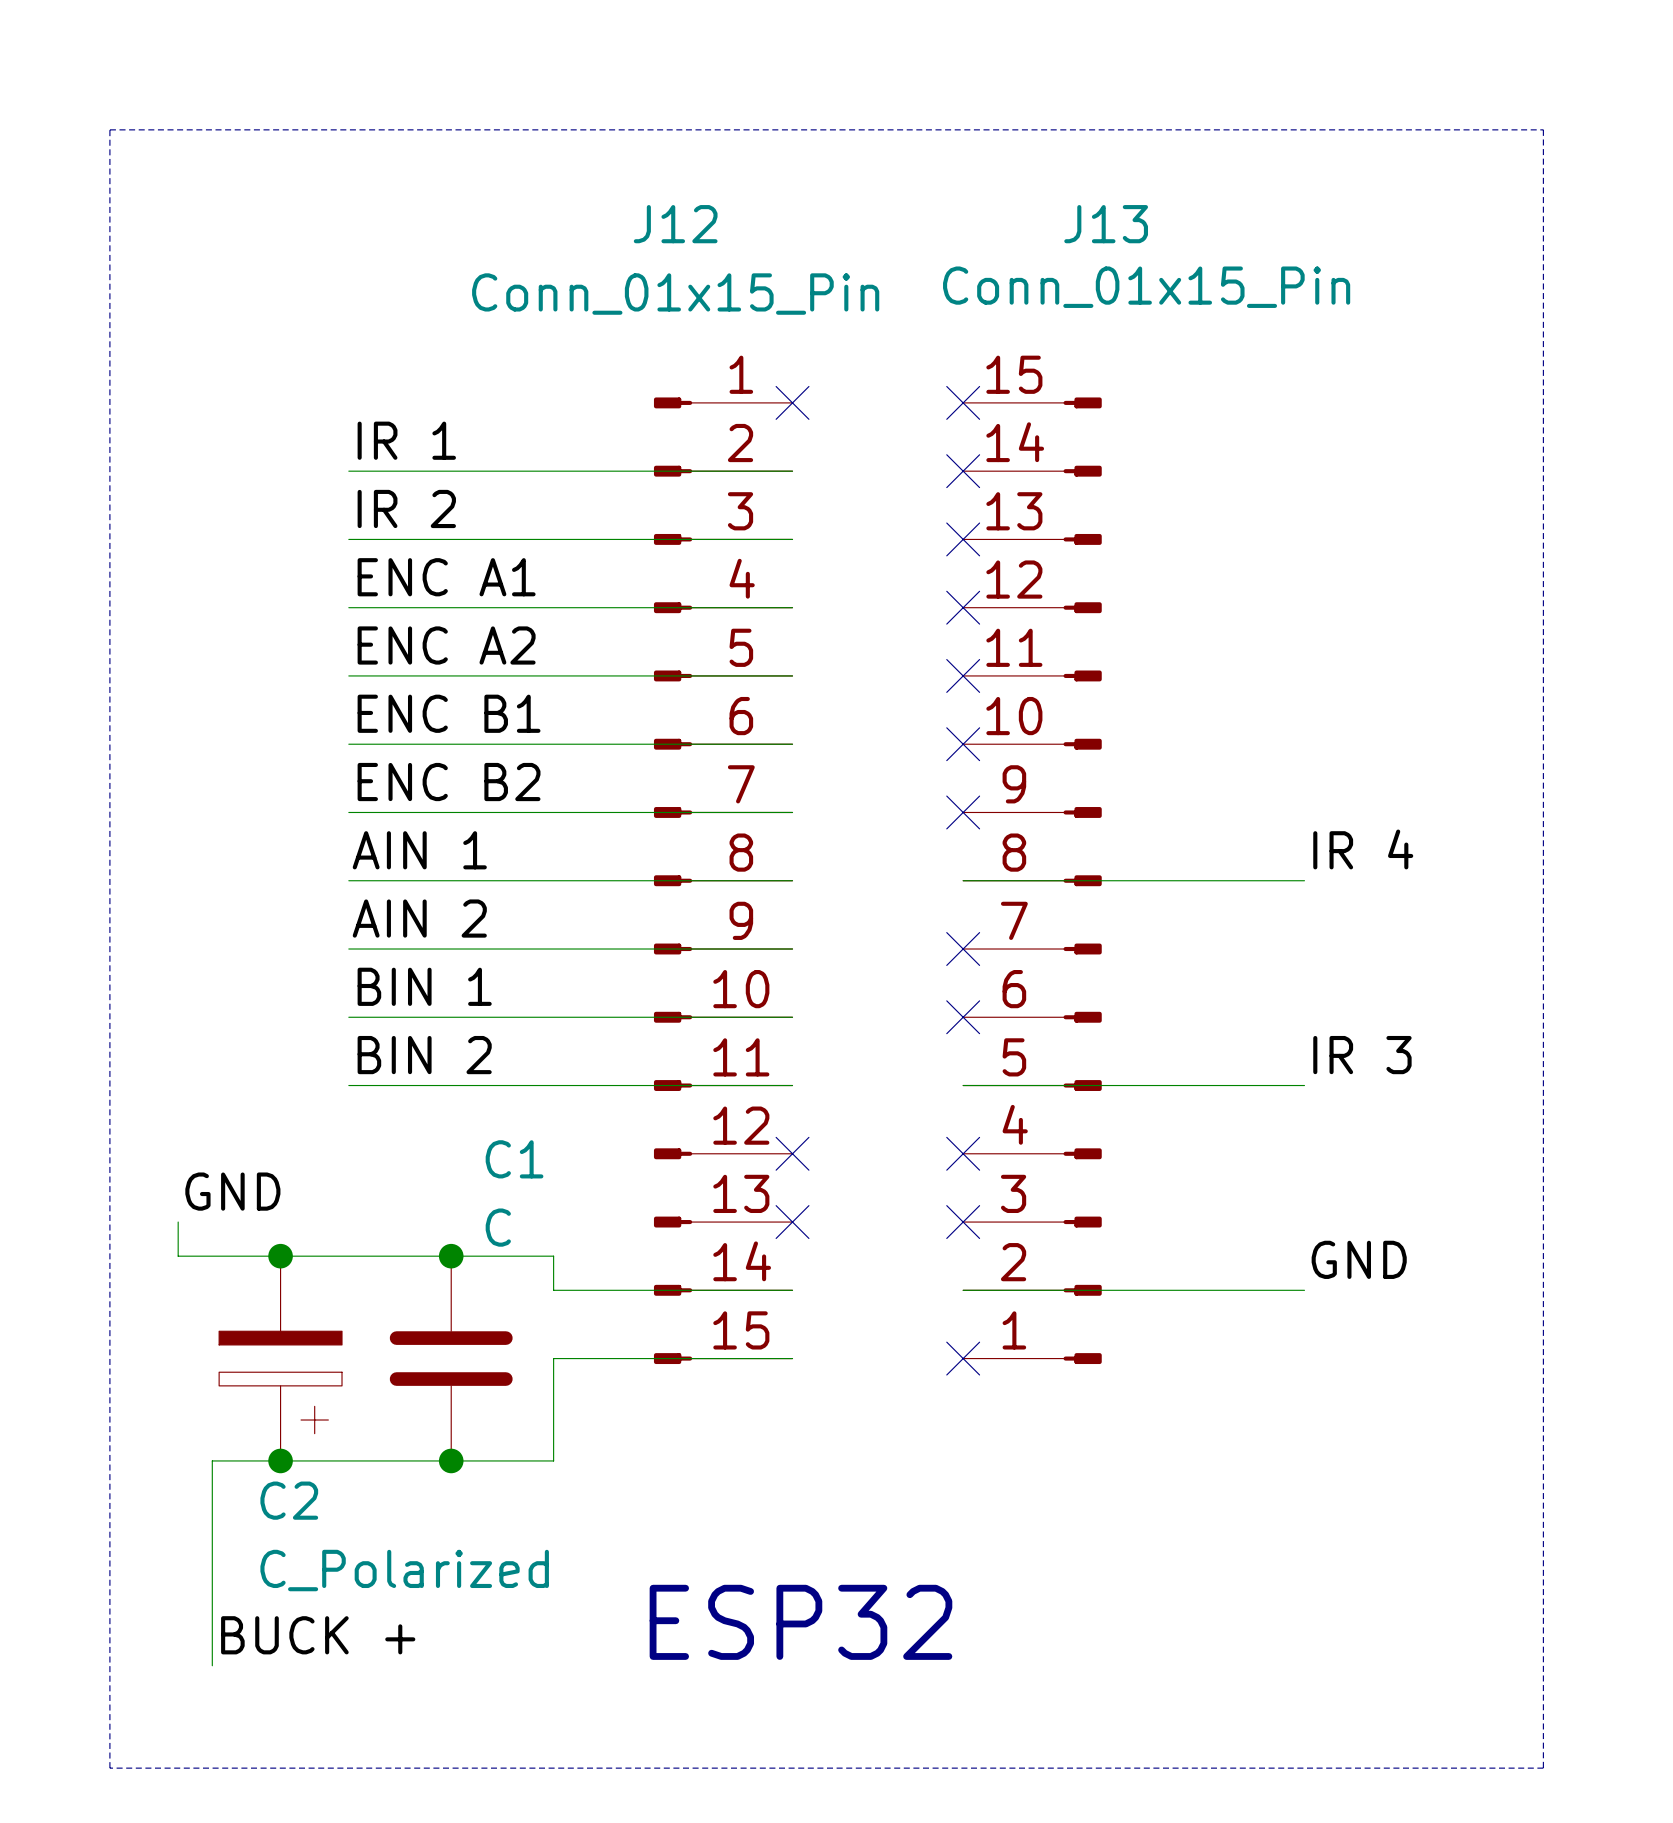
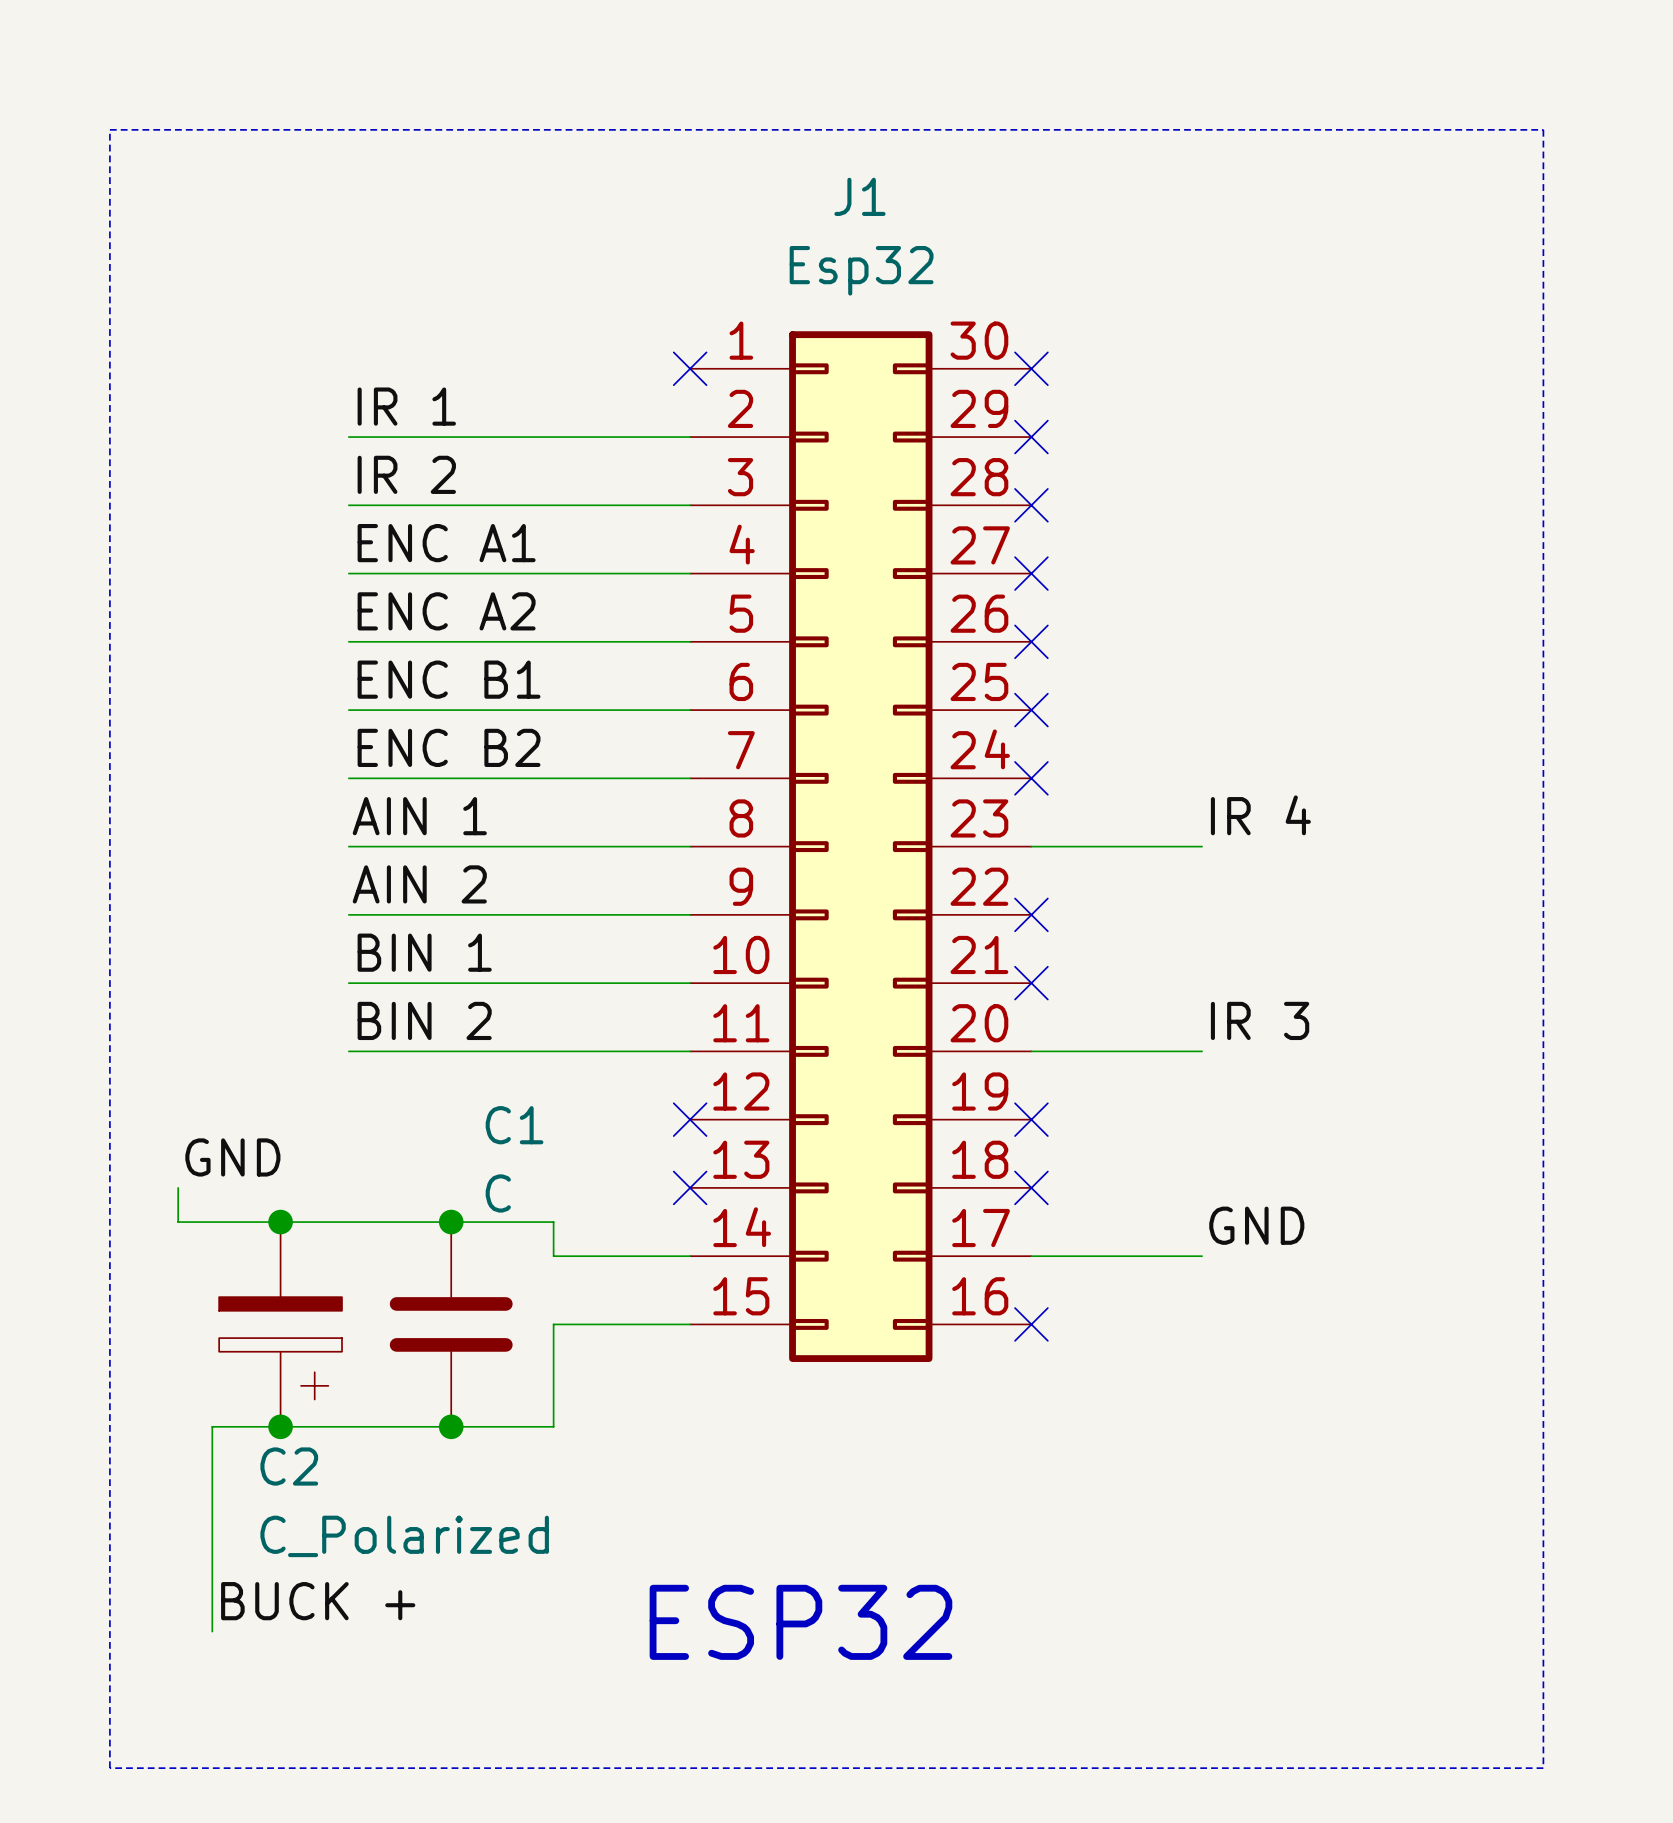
no-connect mark: none -> (1031, 368)
no-connect mark position: (792, 402) -> (690, 368)
no-connect mark: (963, 402) -> none
wire: none -> (348, 437) (690, 437)
no-connect mark: none -> (1031, 437)
label position: IR 1 (406, 440) -> IR 1 (406, 406)
wire: (348, 471) (792, 471) -> none
no-connect mark: (963, 471) -> none
wire: none -> (348, 505) (690, 505)
no-connect mark: none -> (1031, 505)
label position: IR 2 (406, 508) -> IR 2 (406, 474)
wire: (348, 539) (792, 539) -> none
no-connect mark: (963, 539) -> none
wire: none -> (348, 573) (690, 573)
no-connect mark: none -> (1031, 573)
label position: ENC A1 (446, 577) -> ENC A1 (446, 543)
wire: (348, 607) (792, 607) -> none
no-connect mark: (963, 607) -> none
no-connect mark: none -> (1031, 641)
label position: ENC A2 (446, 645) -> ENC A2 (446, 611)
wire: (348, 675) (792, 675) -> none
no-connect mark: (963, 675) -> none
wire: none -> (348, 710) (690, 710)
no-connect mark: none -> (1031, 710)
label position: ENC B1 (449, 713) -> ENC B1 (449, 679)
wire: (348, 744) (792, 744) -> none
no-connect mark: (963, 744) -> none
wire: none -> (348, 778) (690, 778)
no-connect mark: none -> (1031, 778)
label position: ENC B2 (449, 782) -> ENC B2 (449, 747)
wire: (348, 812) (792, 812) -> none
no-connect mark: (963, 812) -> none
J1: none -> Esp32 (860, 846)
wire: none -> (1031, 846) (1202, 846)
label position: IR 4 (1363, 849) -> IR 4 (1260, 815)
label position: AIN 1 (419, 850) -> AIN 1 (419, 816)
wire: (348, 880) (792, 880) -> none
J12: Conn_01x15_Pin (723, 880) -> none
wire: (963, 880) (1304, 880) -> (348, 641) (690, 641)
J13: Conn_01x15_Pin (1032, 880) -> none
wire: none -> (348, 914) (690, 914)
no-connect mark: none -> (1031, 914)
label position: AIN 2 (419, 918) -> AIN 2 (419, 884)
wire: (348, 949) (792, 949) -> none
no-connect mark: (963, 949) -> none
wire: none -> (348, 983) (690, 983)
no-connect mark: none -> (1031, 983)
label position: BIN 1 (424, 986) -> BIN 1 (424, 952)
wire: (348, 1017) (792, 1017) -> none
no-connect mark: (963, 1017) -> none
wire: none -> (1031, 1051) (1202, 1051)
label position: BIN 2 (424, 1055) -> BIN 2 (424, 1020)
label position: IR 3 (1362, 1055) -> IR 3 (1260, 1020)
wire: (348, 1085) (792, 1085) -> none
wire: (963, 1085) (1304, 1085) -> (348, 846) (690, 846)
no-connect mark: none -> (690, 1119)
no-connect mark: none -> (1031, 1119)
no-connect mark: (792, 1153) -> none
no-connect mark: (963, 1153) -> none
wire: none -> (178, 1187) (178, 1222) (553, 1222) (553, 1256) (690, 1256)
no-connect mark: none -> (690, 1187)
no-connect mark: none -> (1031, 1187)
label position: GND (232, 1191) -> GND (232, 1157)
wire: (178, 1222) (178, 1256) (553, 1256) (553, 1290) (792, 1290) -> none
no-connect mark: (792, 1222) -> none
no-connect mark: (963, 1222) -> none
junction position: (280, 1256) -> (280, 1222)
junction position: (451, 1256) -> (451, 1222)
wire: none -> (1031, 1256) (1202, 1256)
label position: GND (1359, 1259) -> GND (1256, 1225)
wire: (963, 1290) (1304, 1290) -> (348, 1051) (690, 1051)
no-connect mark: none -> (1031, 1324)
C2 position: (280, 1358) -> (280, 1324)
C1 position: (451, 1358) -> (451, 1324)
wire: (553, 1358) (792, 1358) -> (553, 1358) (553, 1324) (690, 1324)
no-connect mark: (963, 1358) -> none
wire: (553, 1426) (553, 1460) (212, 1460) -> (553, 1426) (212, 1426) (212, 1460)
junction position: (280, 1460) -> (280, 1426)
junction position: (451, 1460) -> (451, 1426)
wire: (212, 1631) (212, 1665) -> none
label position: BUCK + (318, 1635) -> BUCK + (318, 1601)

